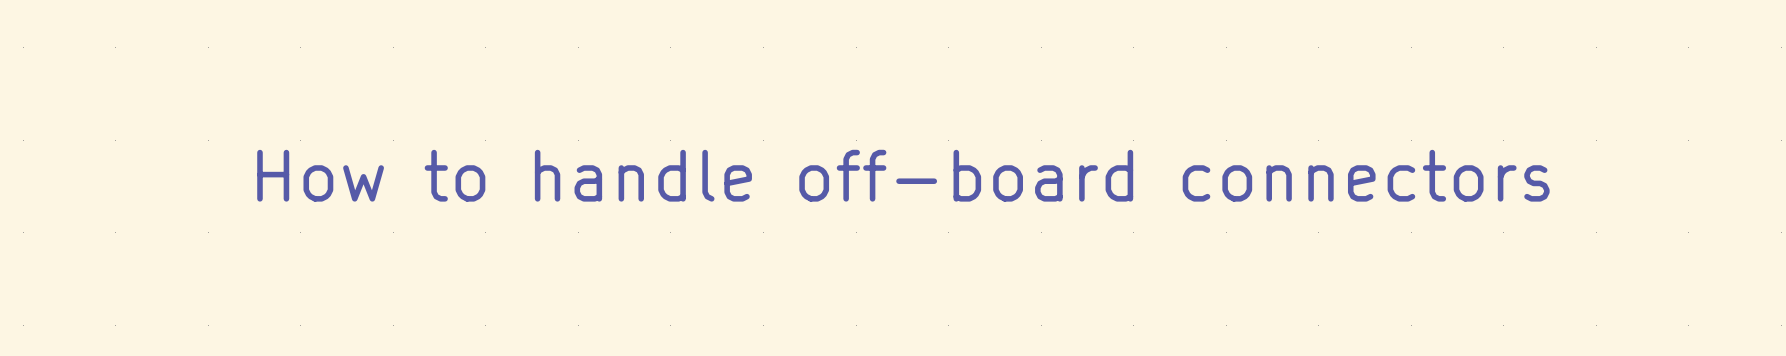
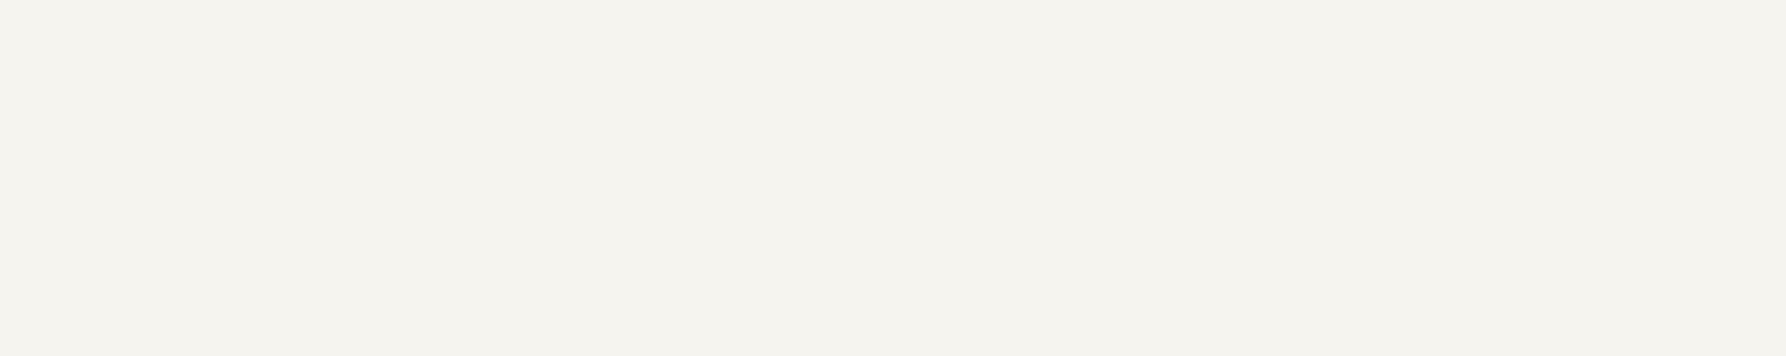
text: How to handle off-board connectors (903, 175) -> none

